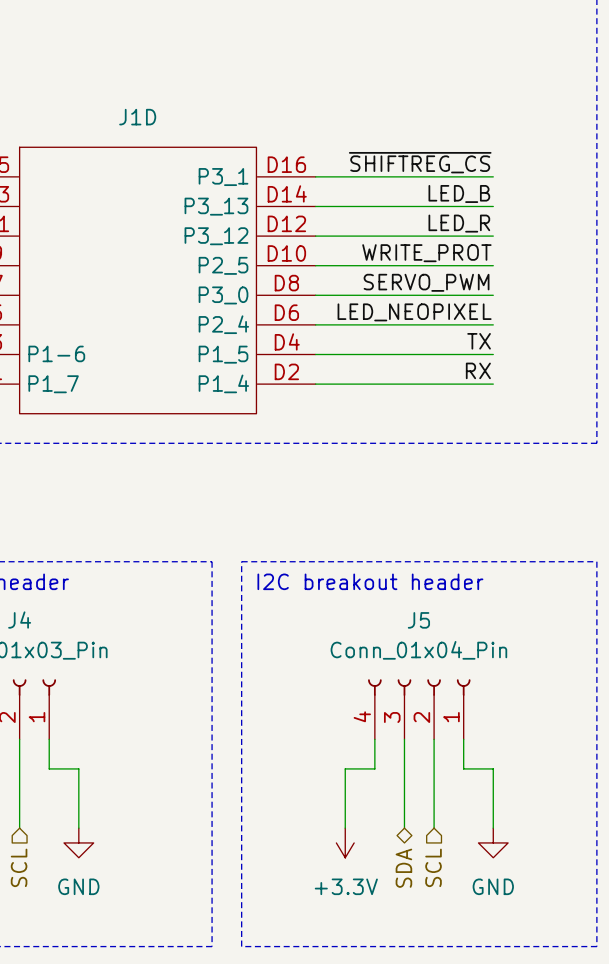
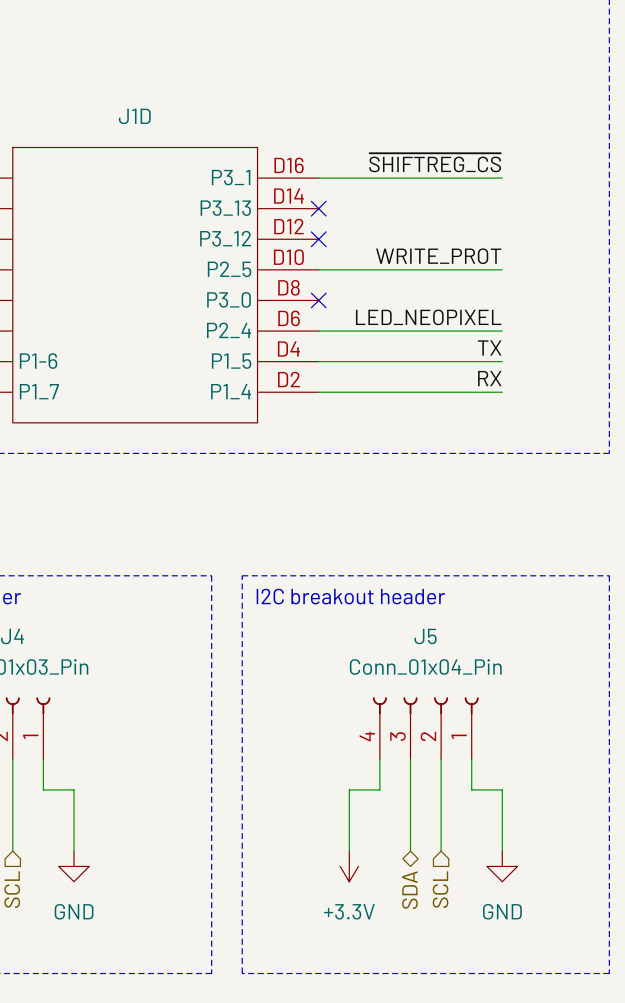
label: LED_B (459, 193) -> none
wire: (315, 206) (493, 206) -> none
no-connect mark: none -> (318, 208)
label: LED_R (459, 223) -> none
wire: (315, 236) (493, 236) -> none
no-connect mark: none -> (318, 239)
label: SERVO_PWM (426, 282) -> none
wire: (315, 295) (493, 295) -> none
no-connect mark: none -> (318, 300)

